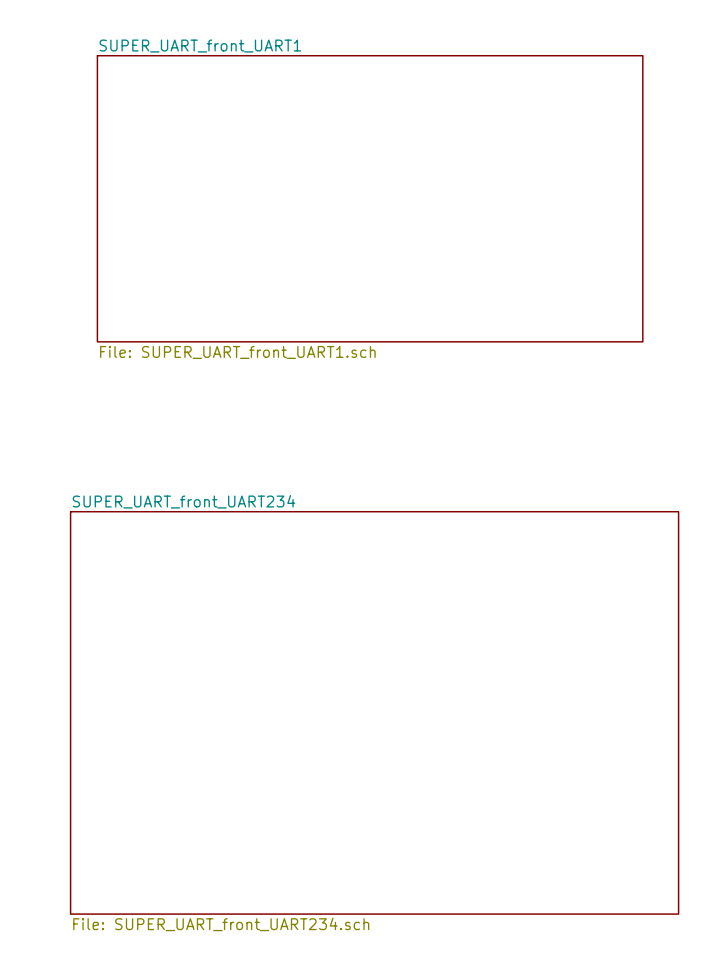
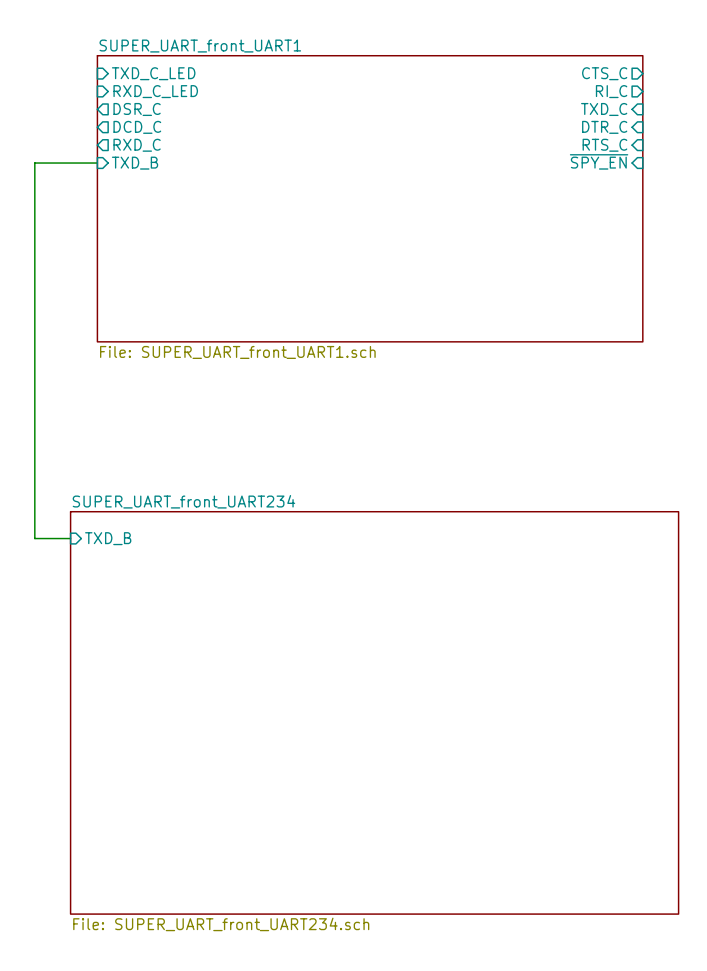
sheet pin: none -> TXD_C_LED (153, 73)
sheet pin: none -> CTS_C (604, 73)
sheet pin: none -> RXD_C_LED (155, 91)
sheet pin: none -> RI_C (611, 91)
sheet pin: none -> DSR_C (137, 109)
sheet pin: none -> TXD_C (604, 109)
sheet pin: none -> DCD_C (137, 127)
sheet pin: none -> DTR_C (604, 127)
sheet pin: none -> RXD_C (137, 145)
sheet pin: none -> RTS_C (604, 145)
sheet pin: none -> ~{SPY_EN} (599, 161)
wire: none -> (97, 163) (34, 163) (34, 538) (70, 538)
sheet pin: none -> TXD_B (135, 163)
sheet pin: none -> TXD_B (108, 538)

